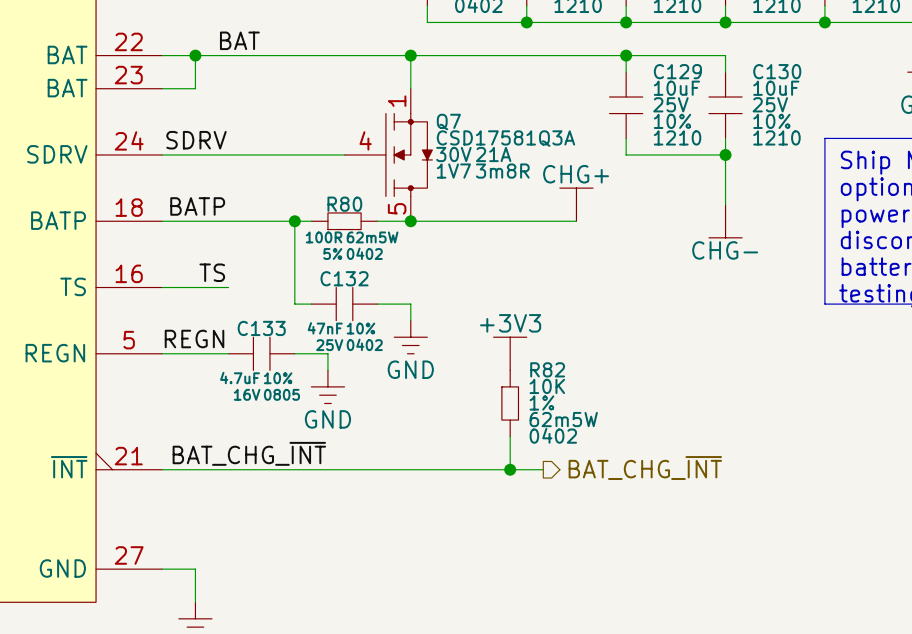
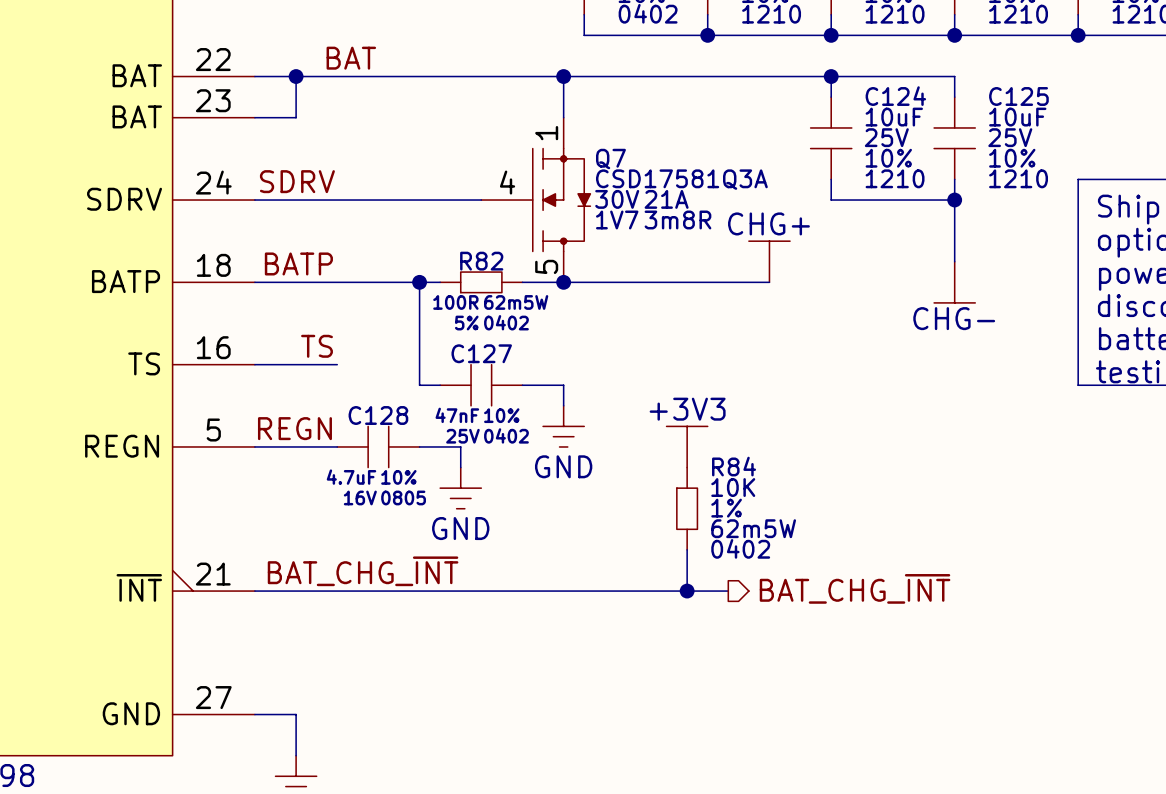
C129 name: C129 (677, 71) -> C124 (895, 96)
C130 name: C130 (777, 71) -> C125 (1018, 96)
R80 name: R80 (344, 204) -> R82 (481, 261)
C132 name: C132 (344, 278) -> C127 (481, 353)
C133 name: C133 (261, 328) -> C128 (378, 415)
R82 name: R82 (547, 369) -> R84 (734, 466)

